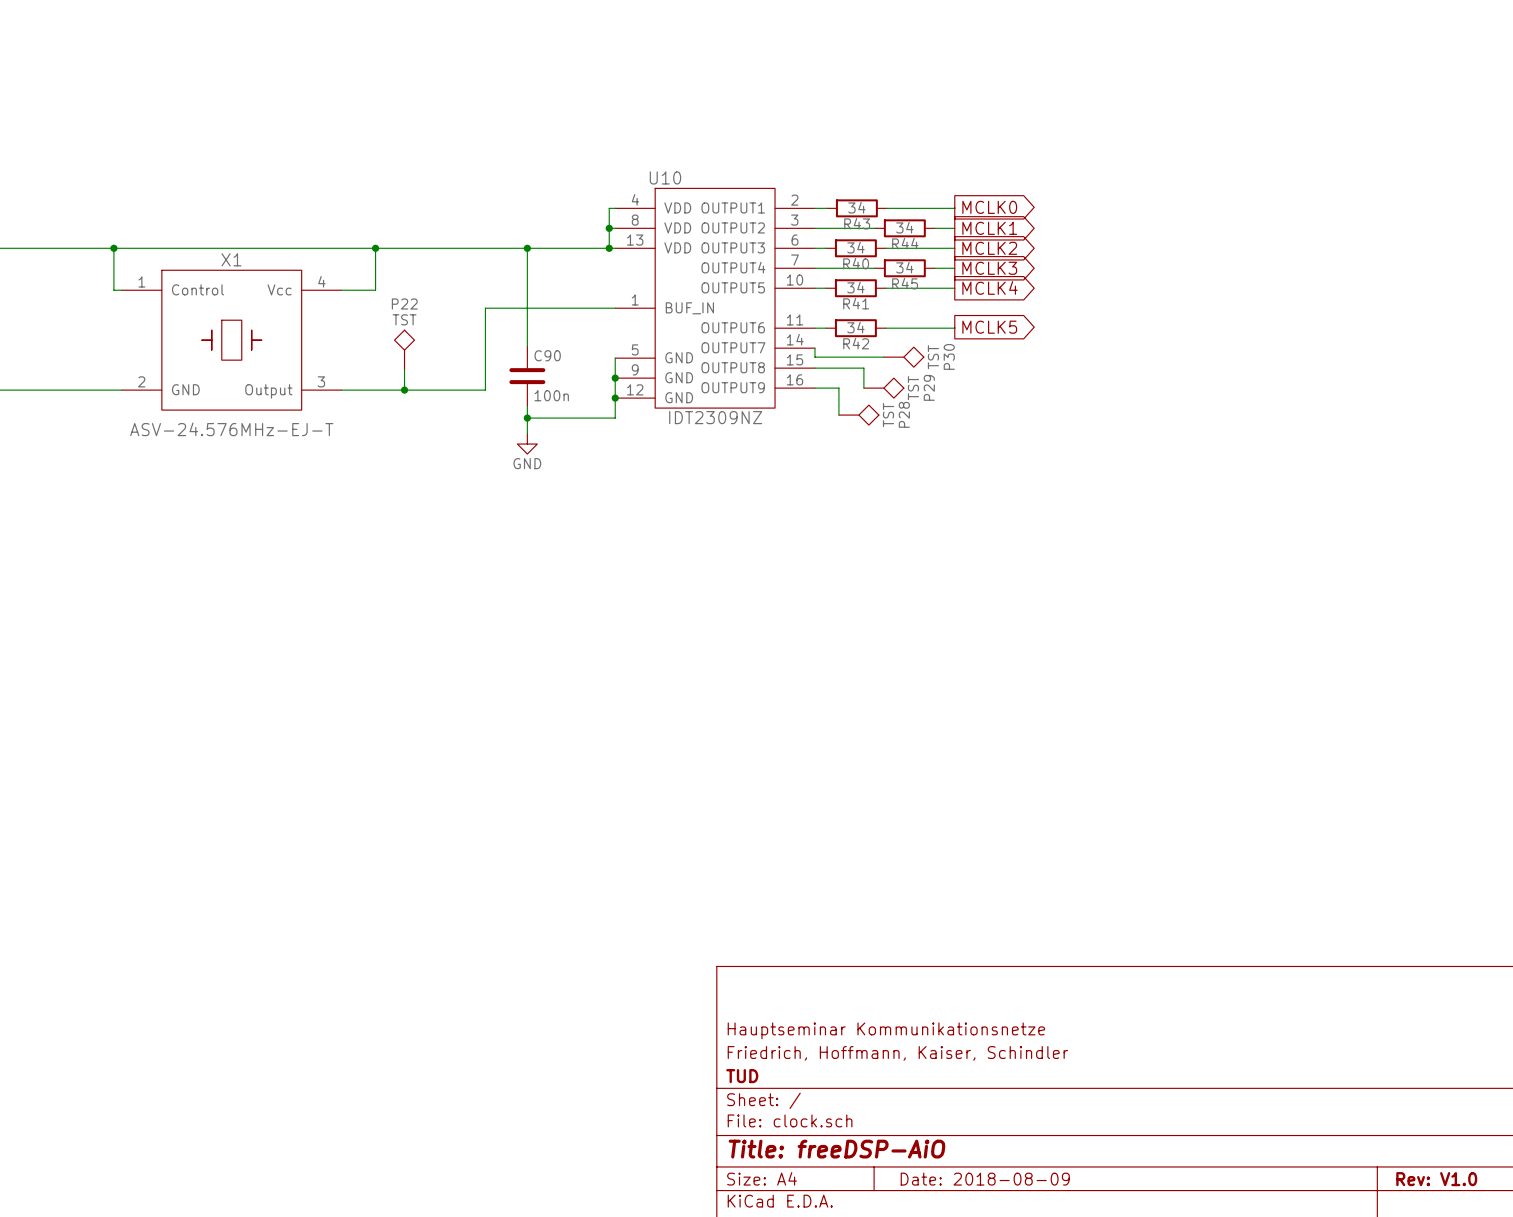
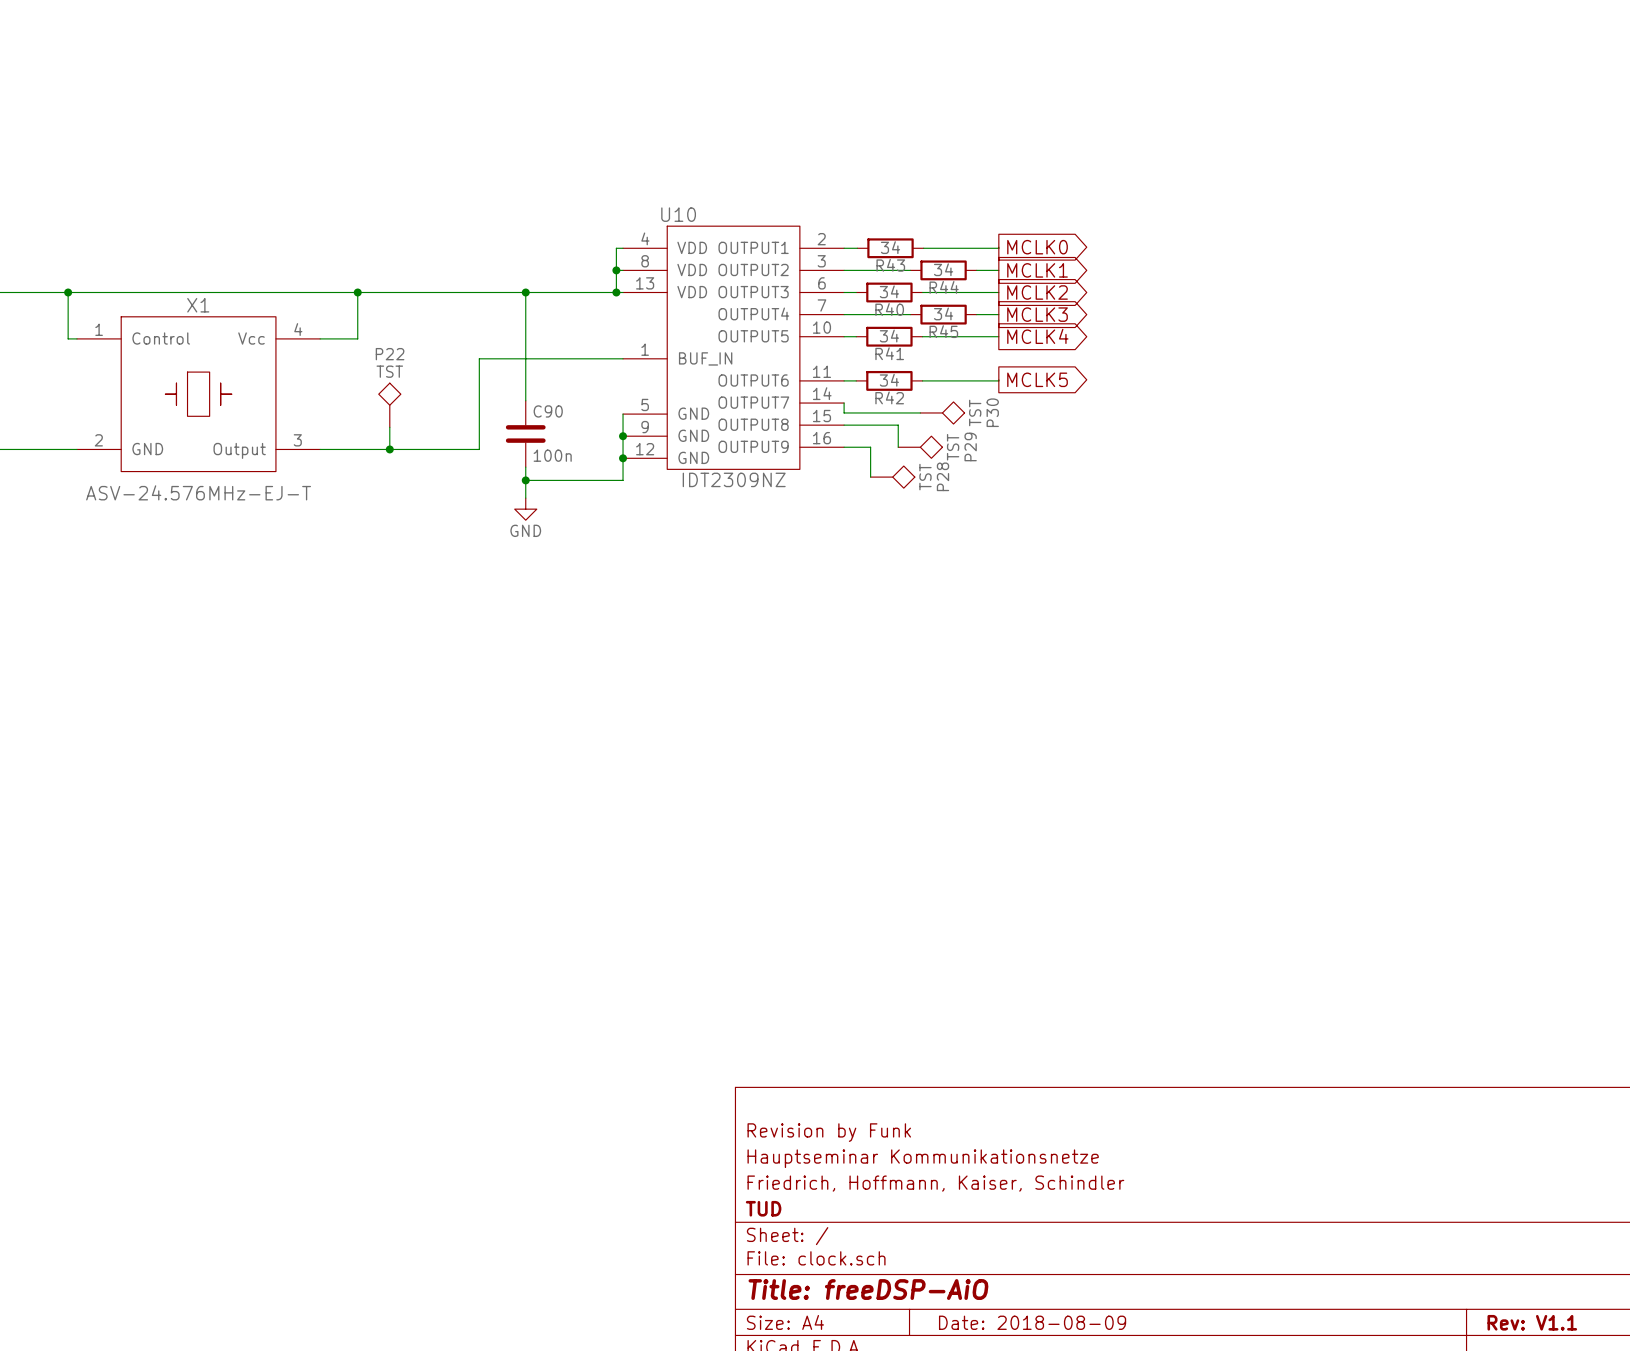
title block: none -> Revision by Funk (829, 1132)
title block: Rev: V1.0 (1436, 1179) -> Rev: V1.1 (1532, 1322)

